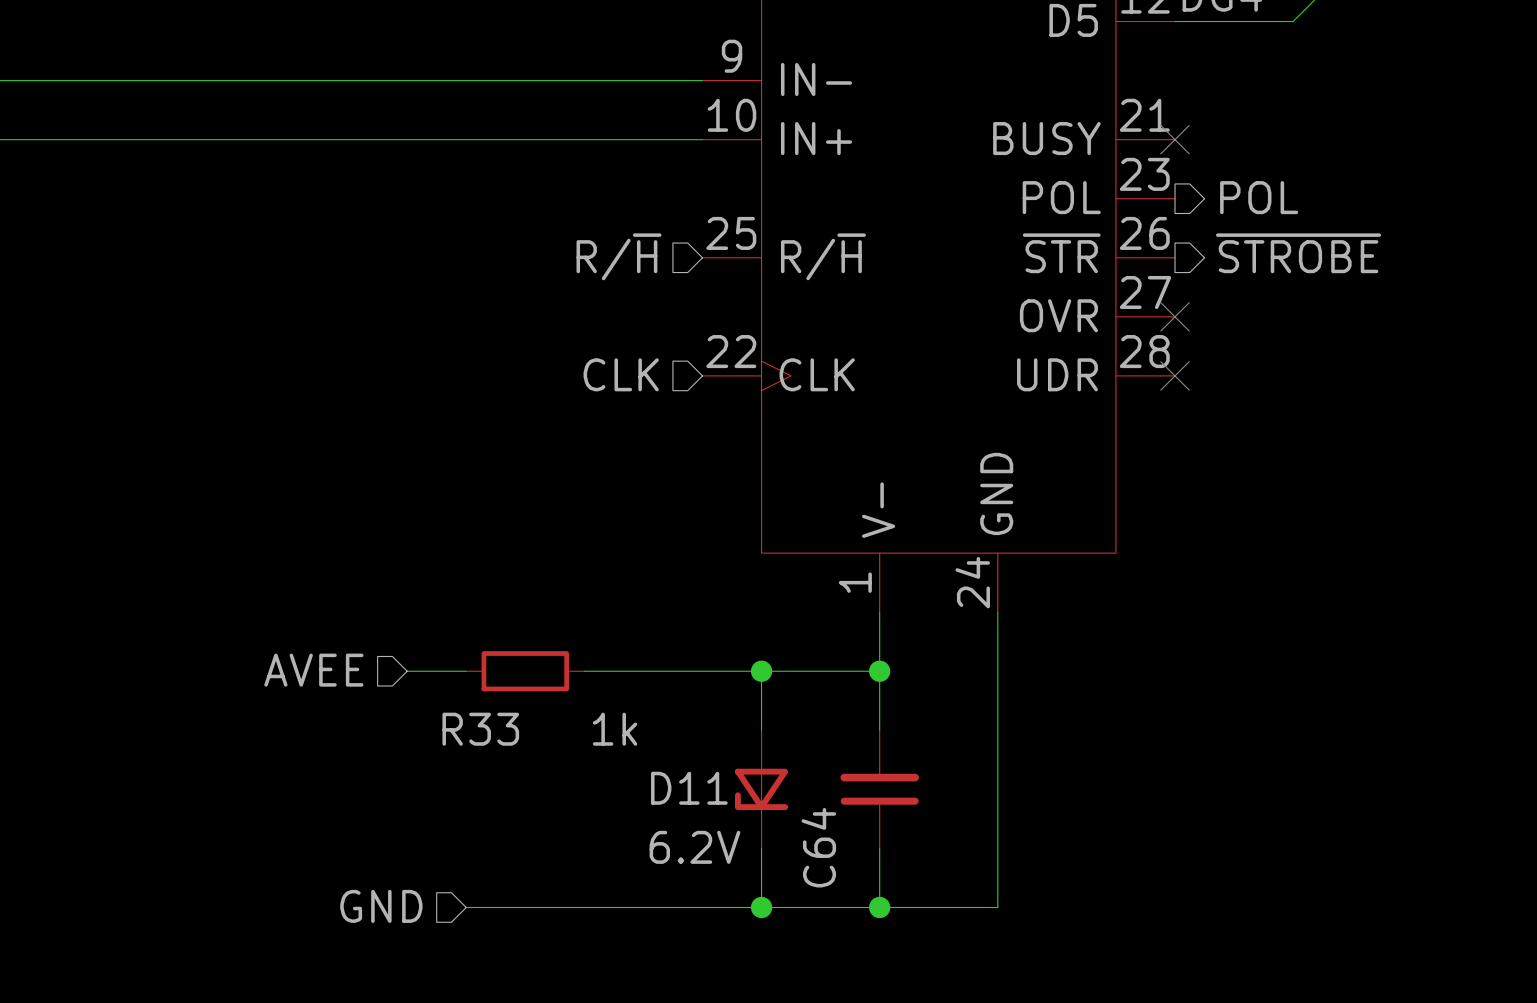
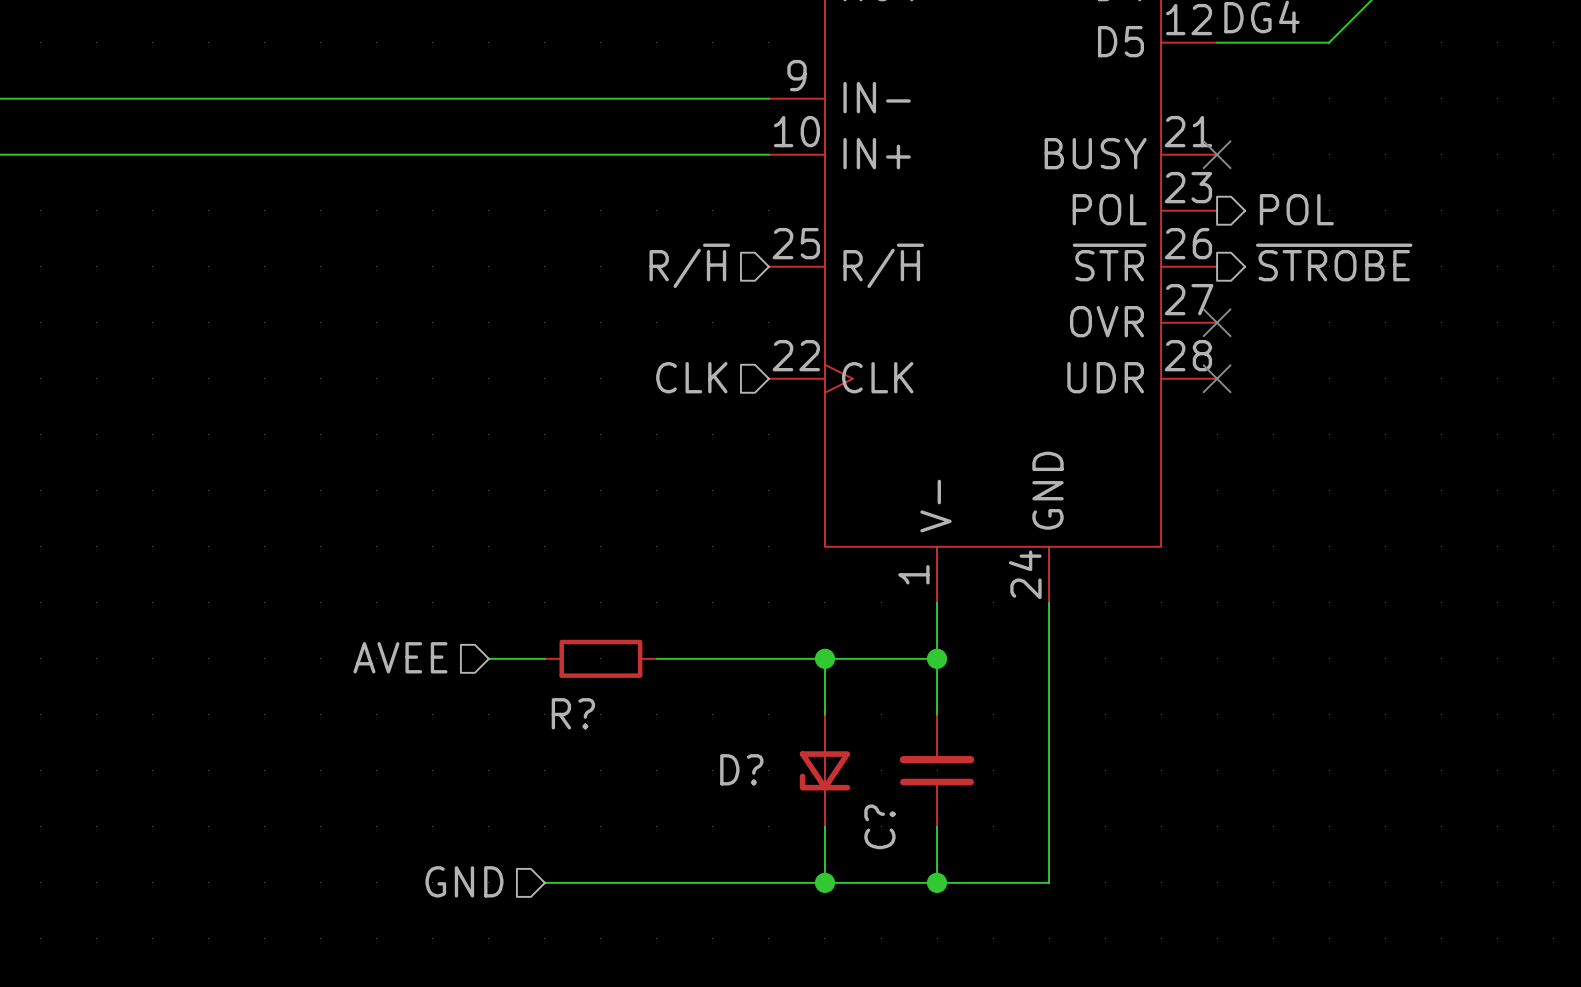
R33 name: R33 (480, 729) -> R? (573, 713)
R33 value: 1k (615, 729) -> none
D11 name: D11 (689, 788) -> D? (741, 769)
D11 value: 6.2V (694, 847) -> none
C64 name: C64 (818, 847) -> C? (879, 826)

